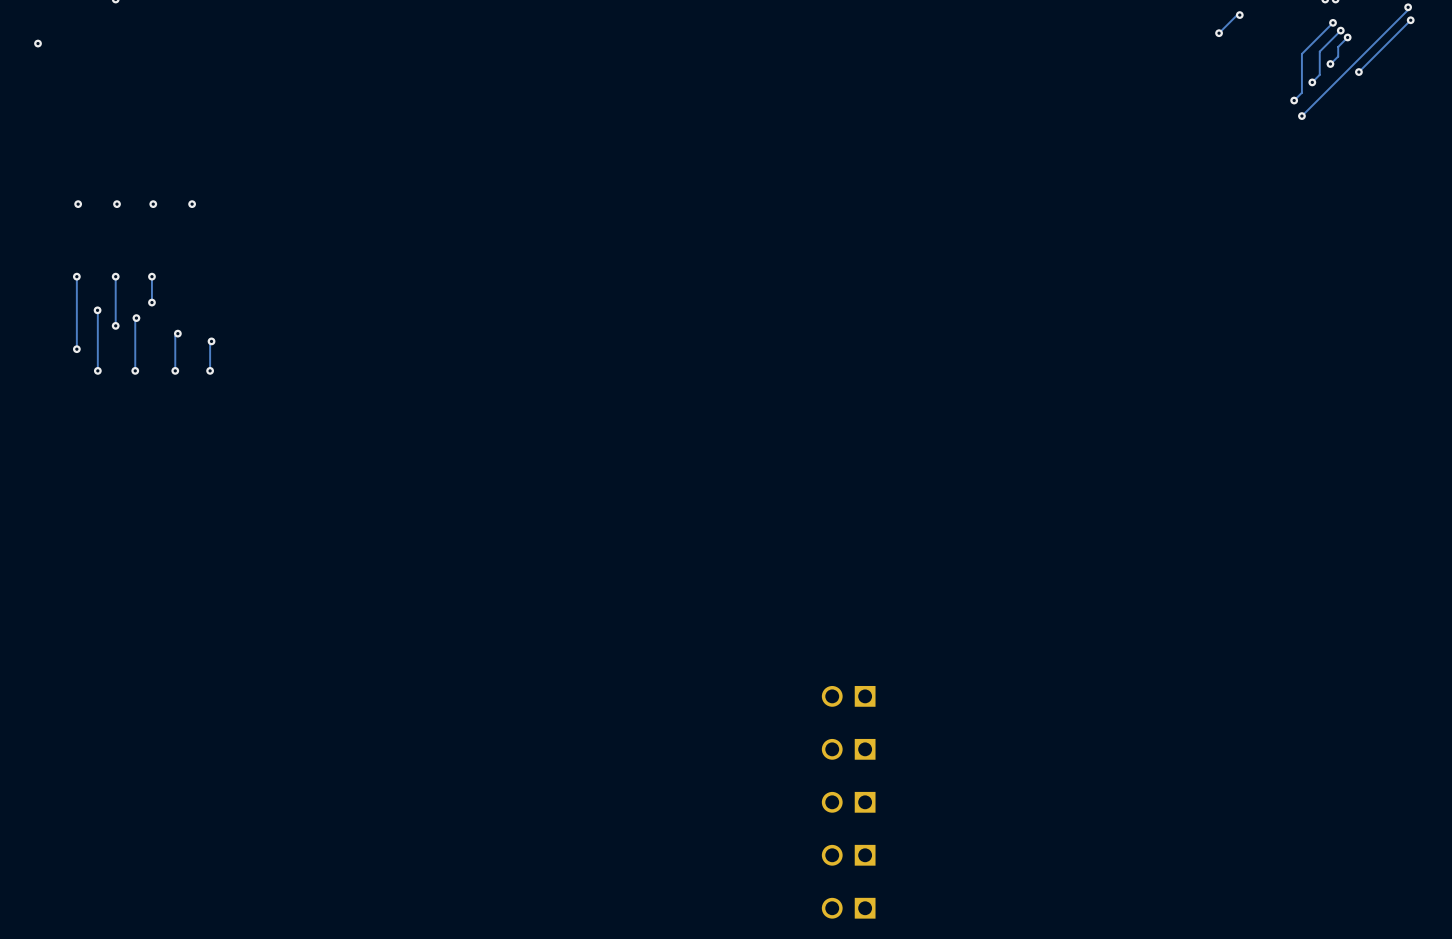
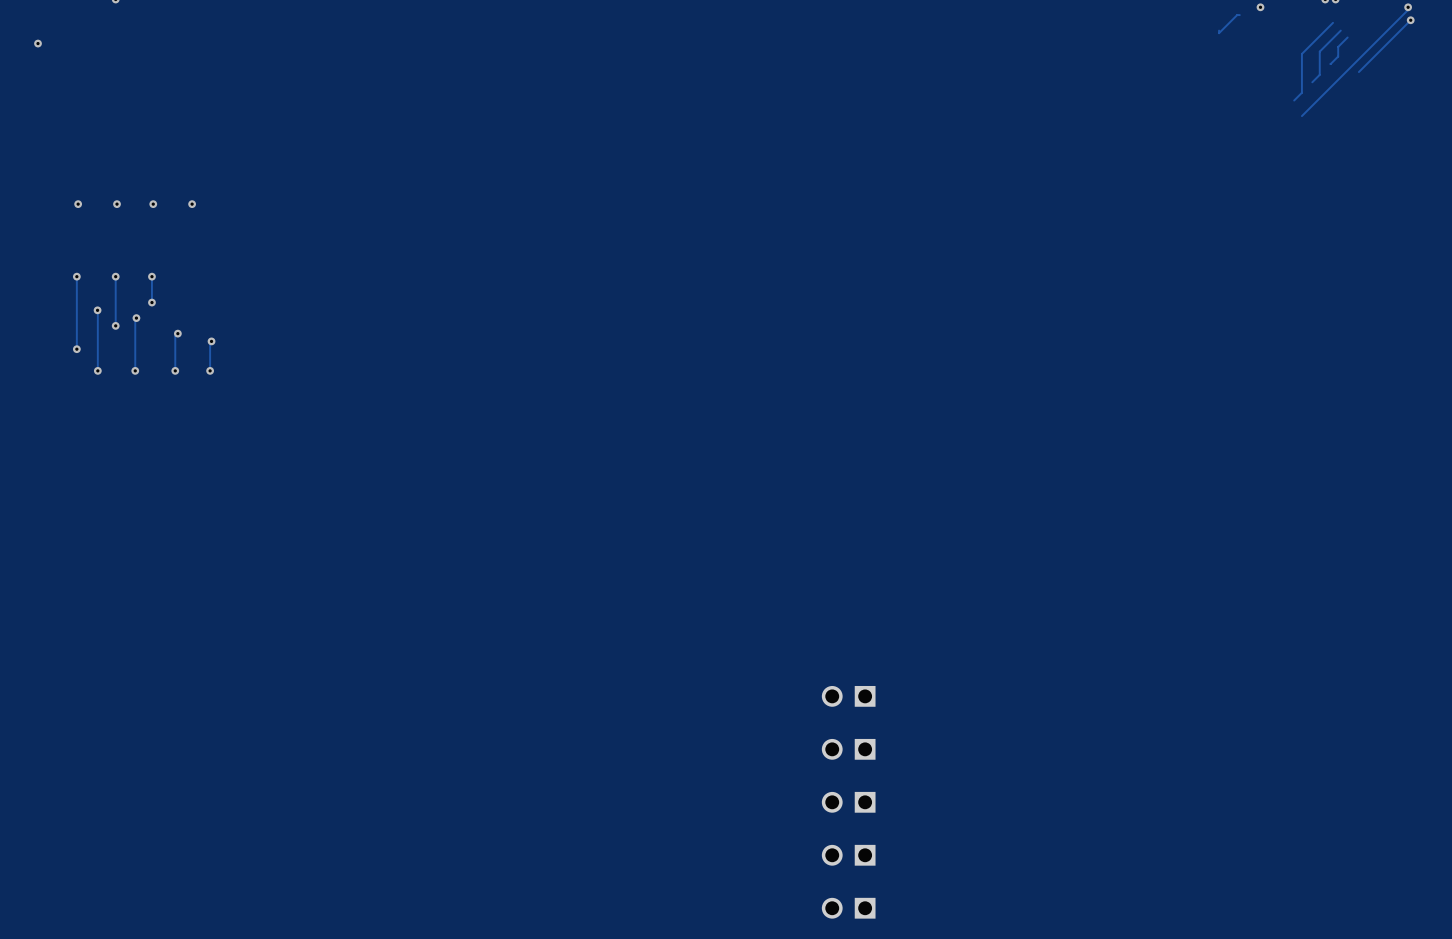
via: none -> (1260, 7)
via: (1239, 15) -> none
via: (1333, 22) -> none
via: (1340, 30) -> none
via: (1219, 33) -> none
via: (1347, 37) -> none
via: (1330, 64) -> none
via: (1358, 72) -> none
via: (1312, 82) -> none
via: (1294, 100) -> none
via: (1301, 116) -> none

